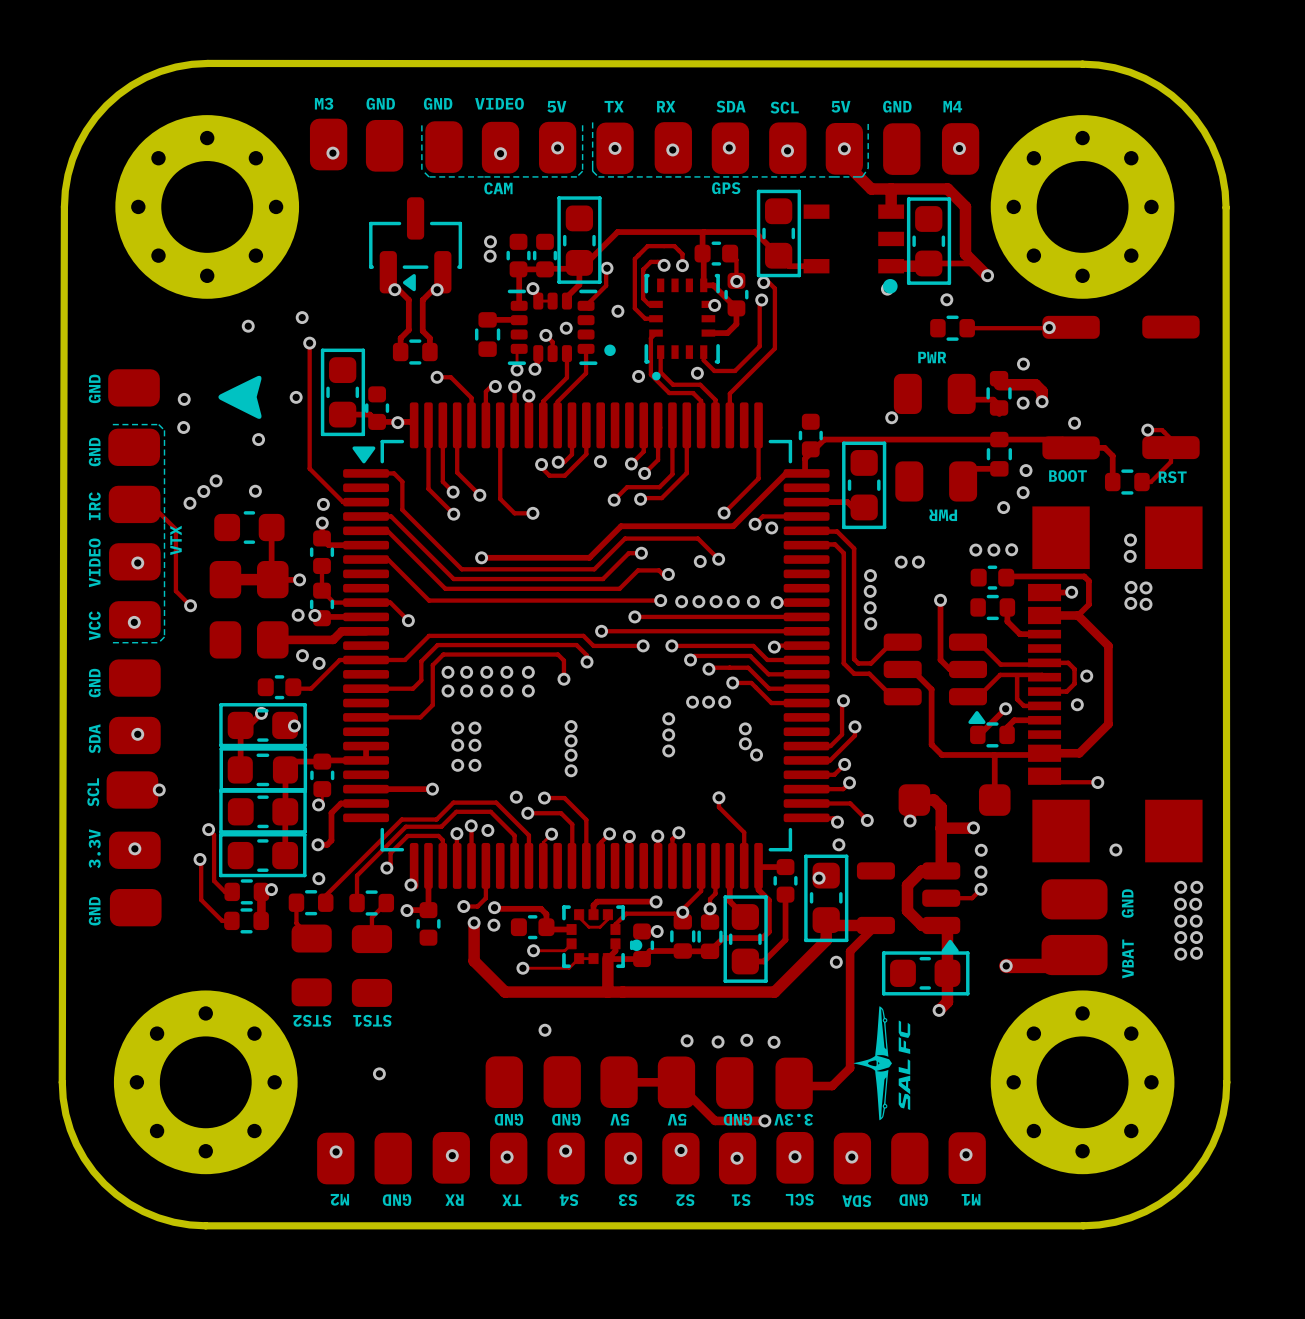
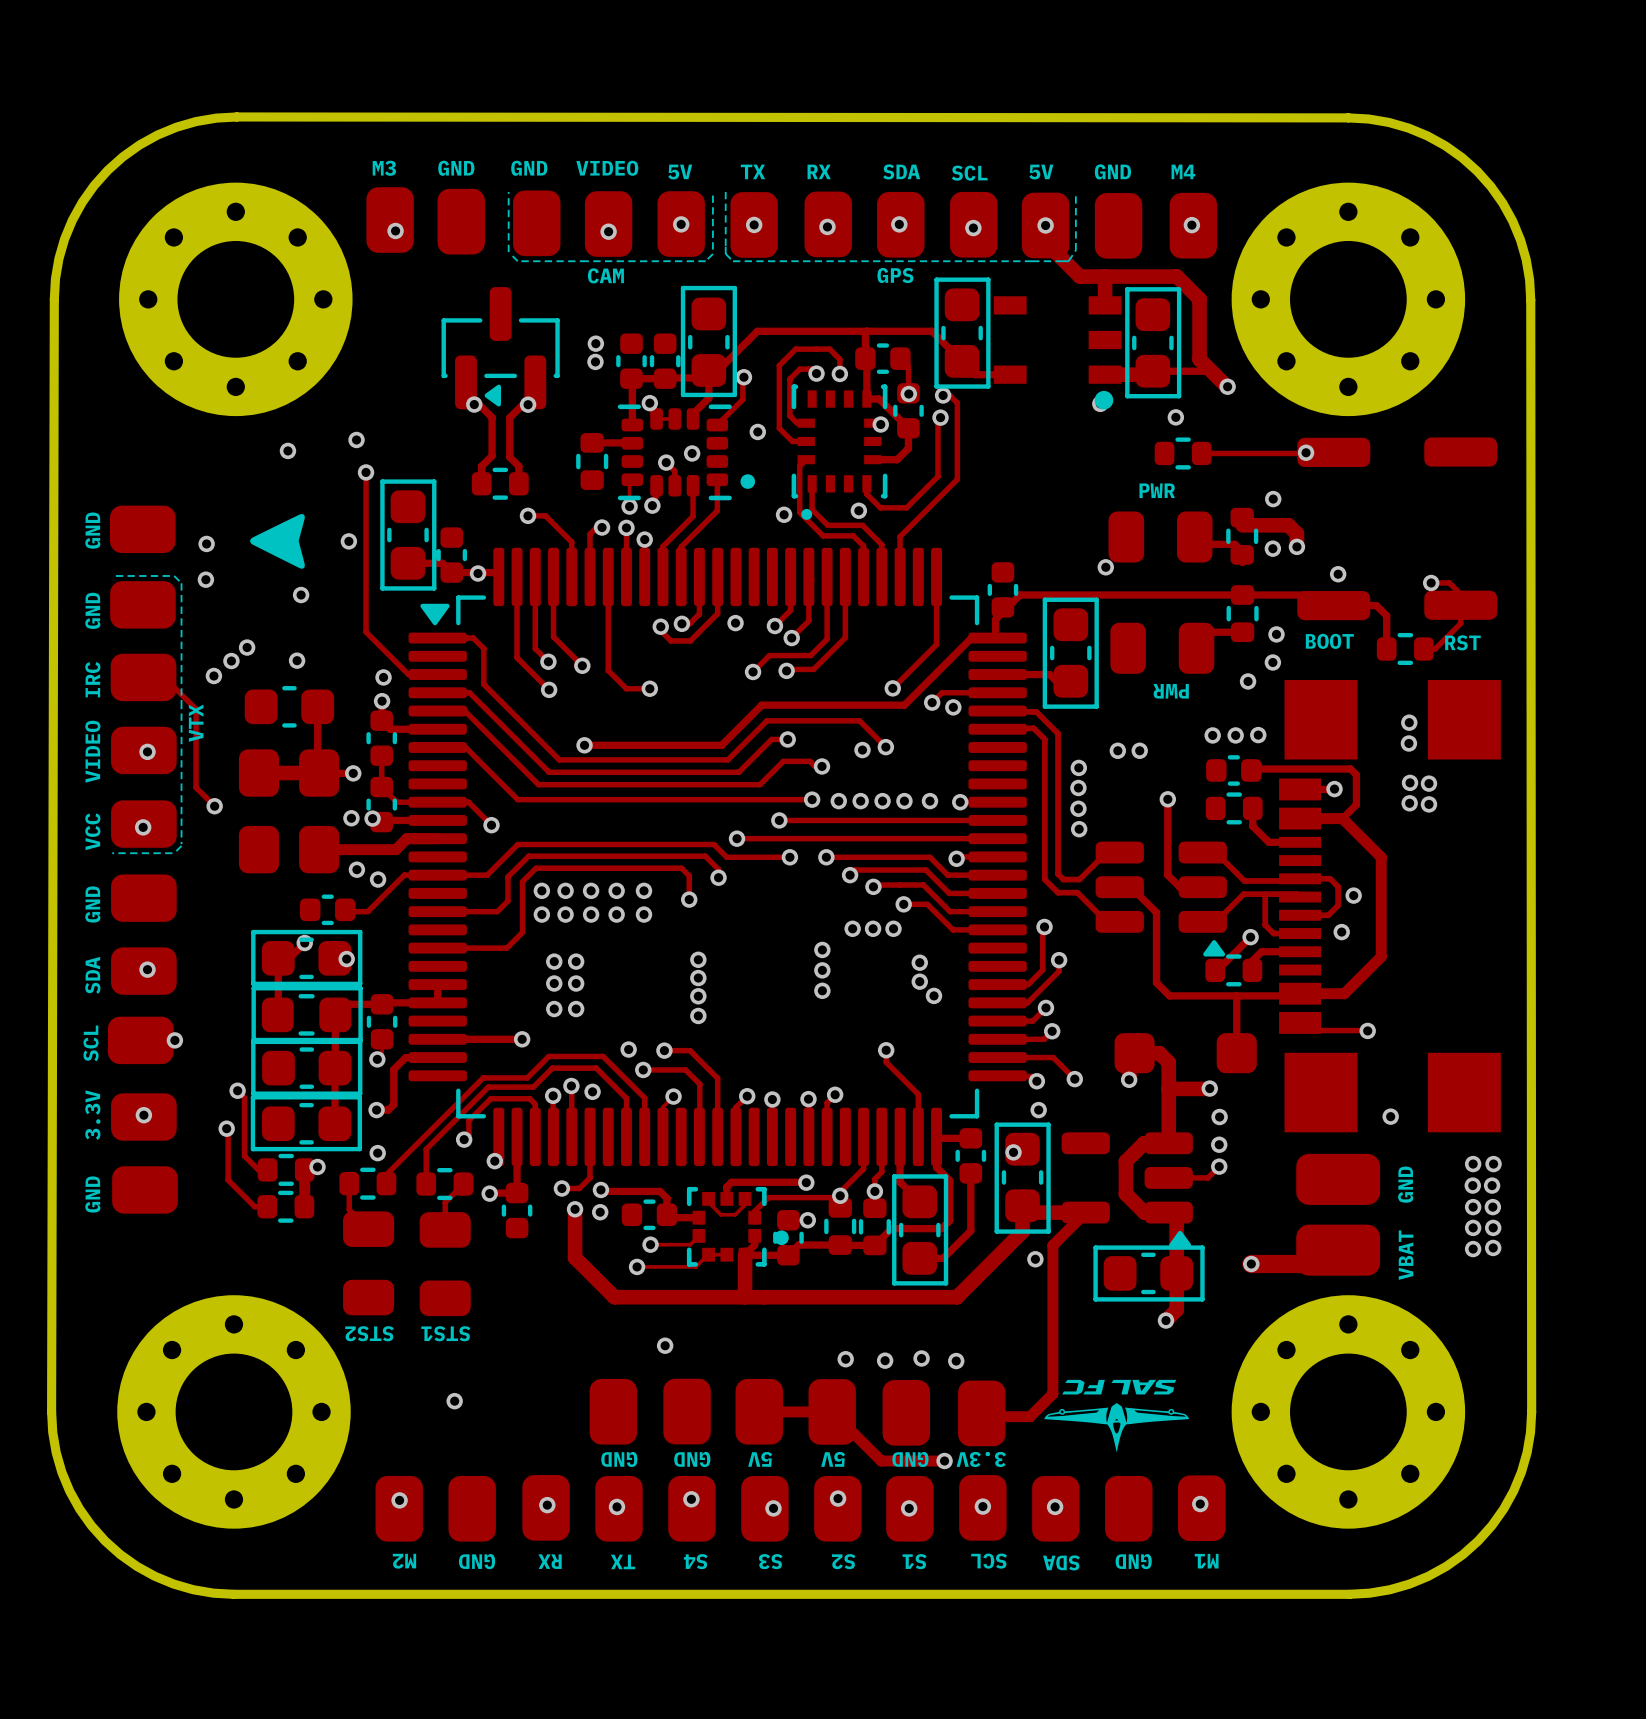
drawing shape: [853, 1006, 911, 1121] -> [1044, 1379, 1190, 1452]

